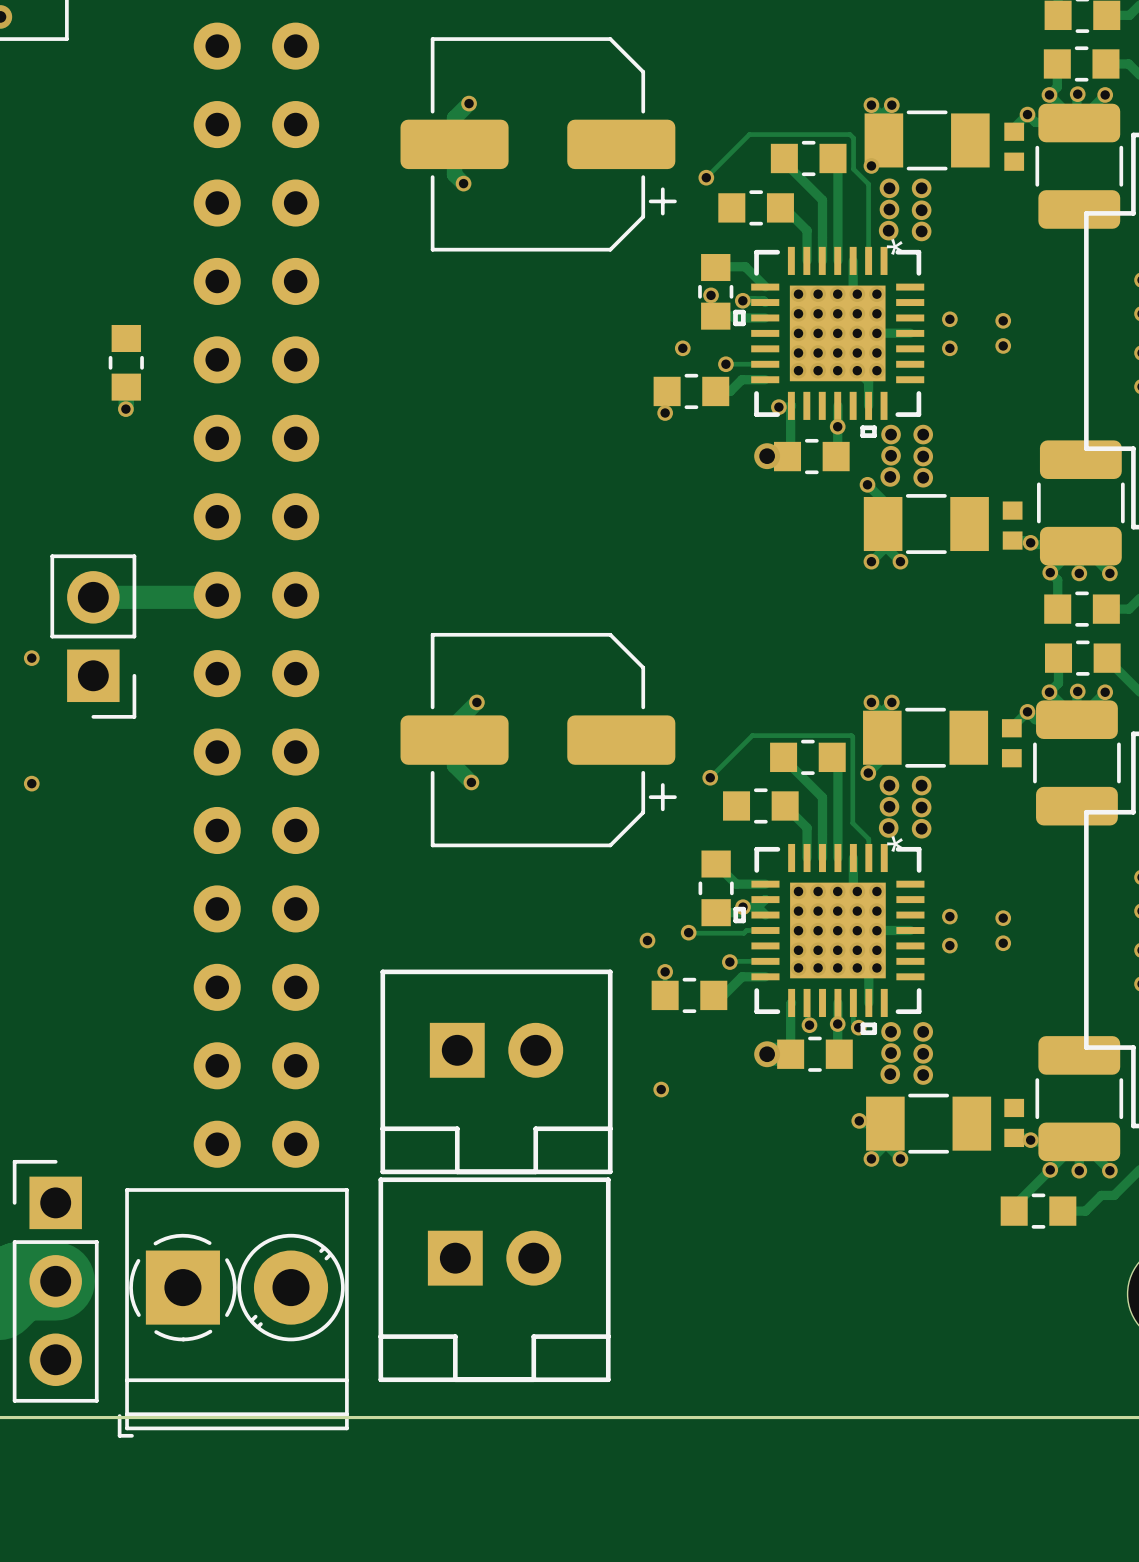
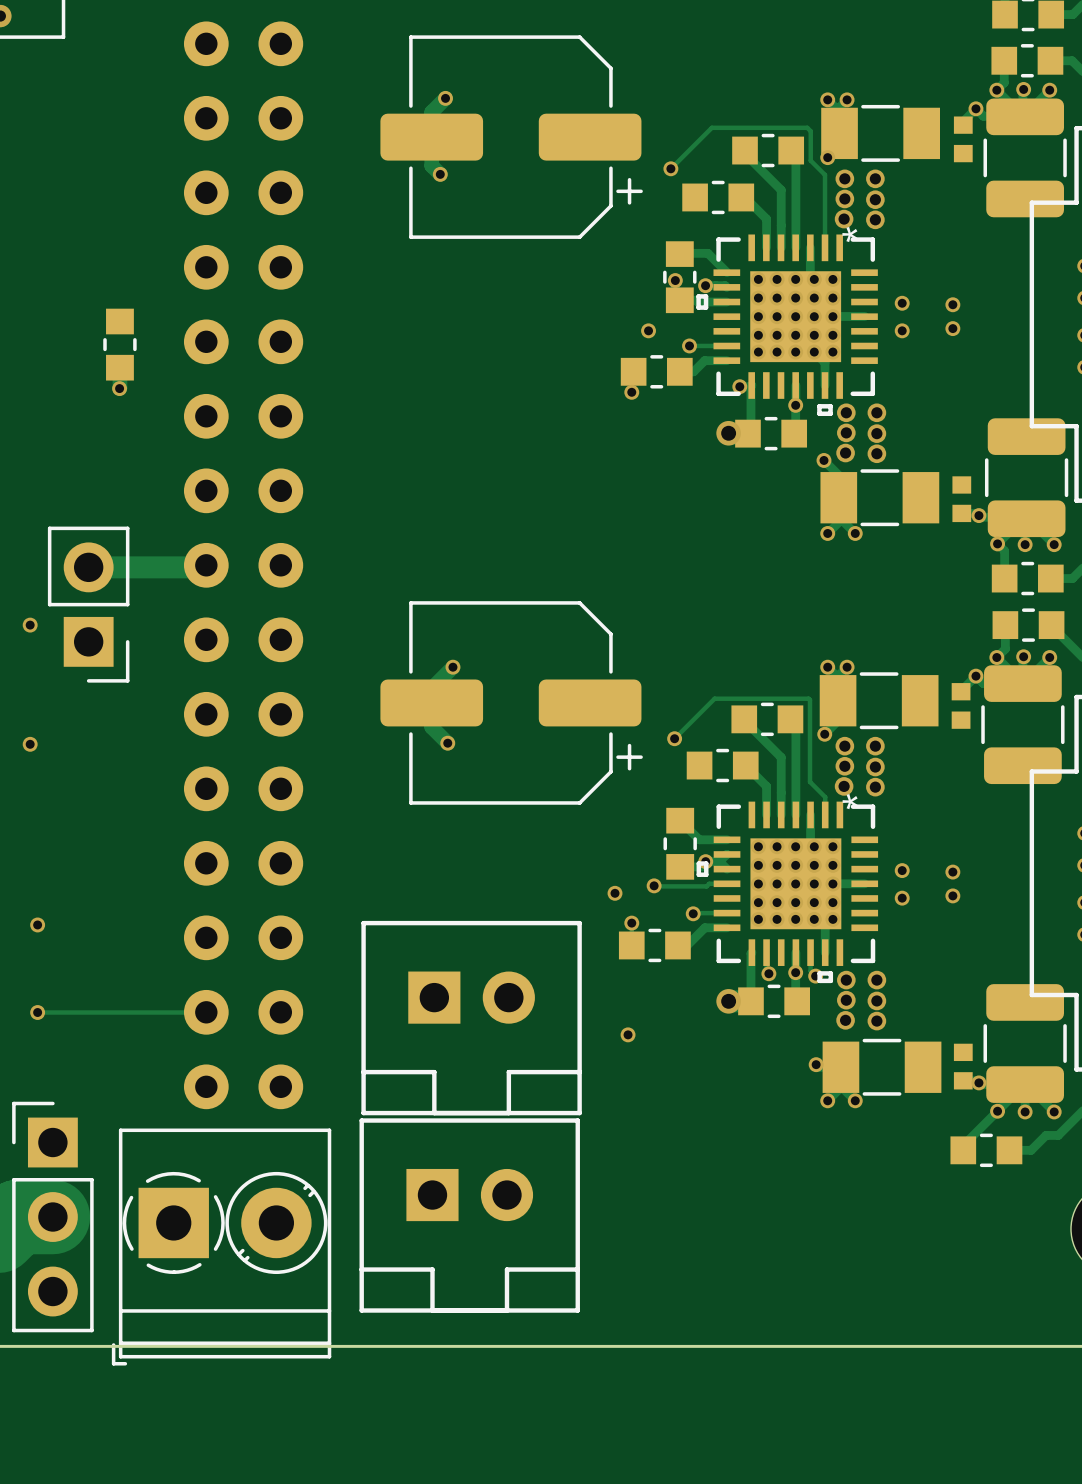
via: none -> (37, 924)
track: none -> (37, 1012) (206, 1012)
via: none -> (37, 1012)

